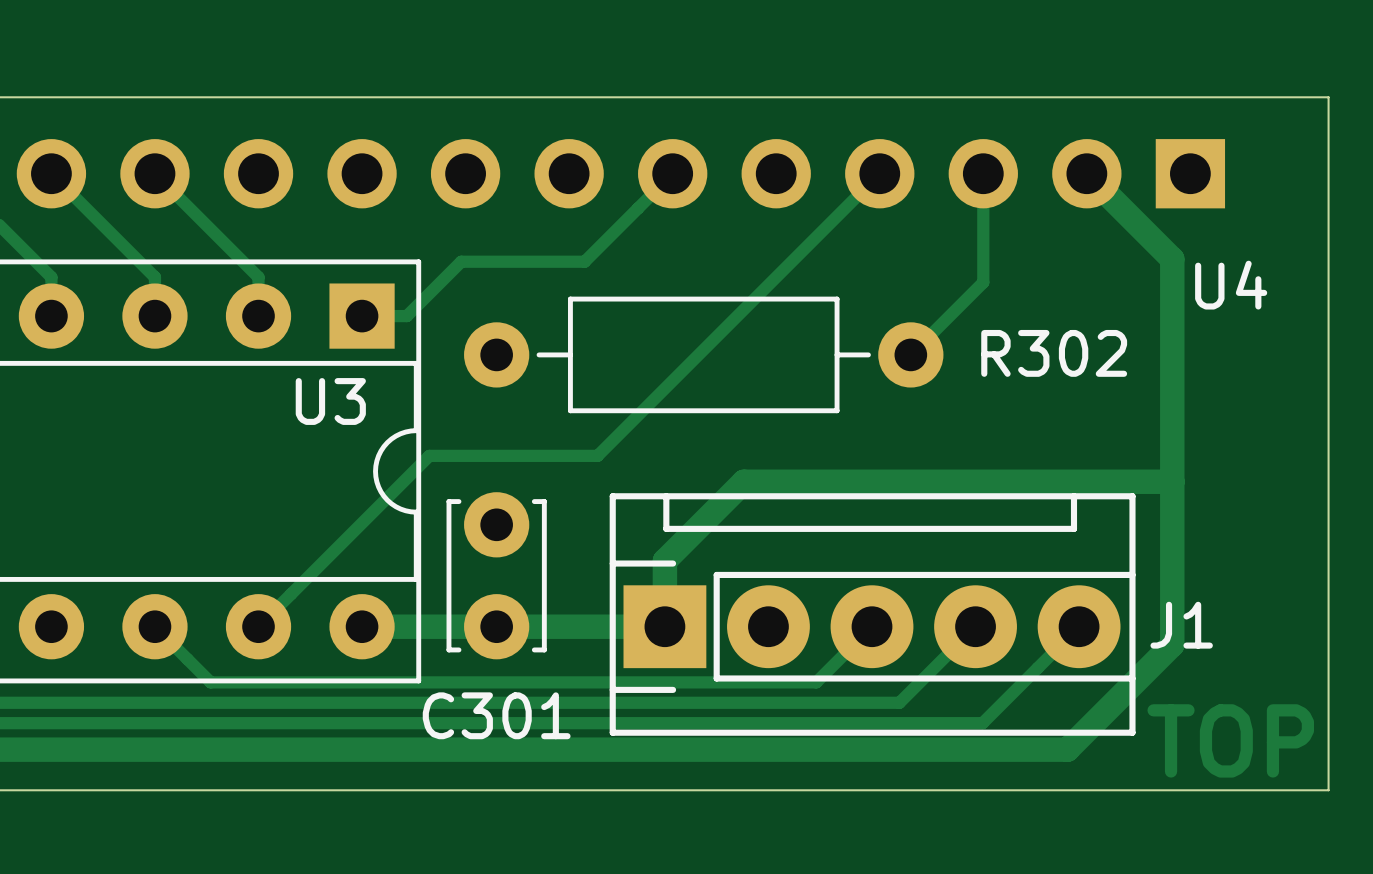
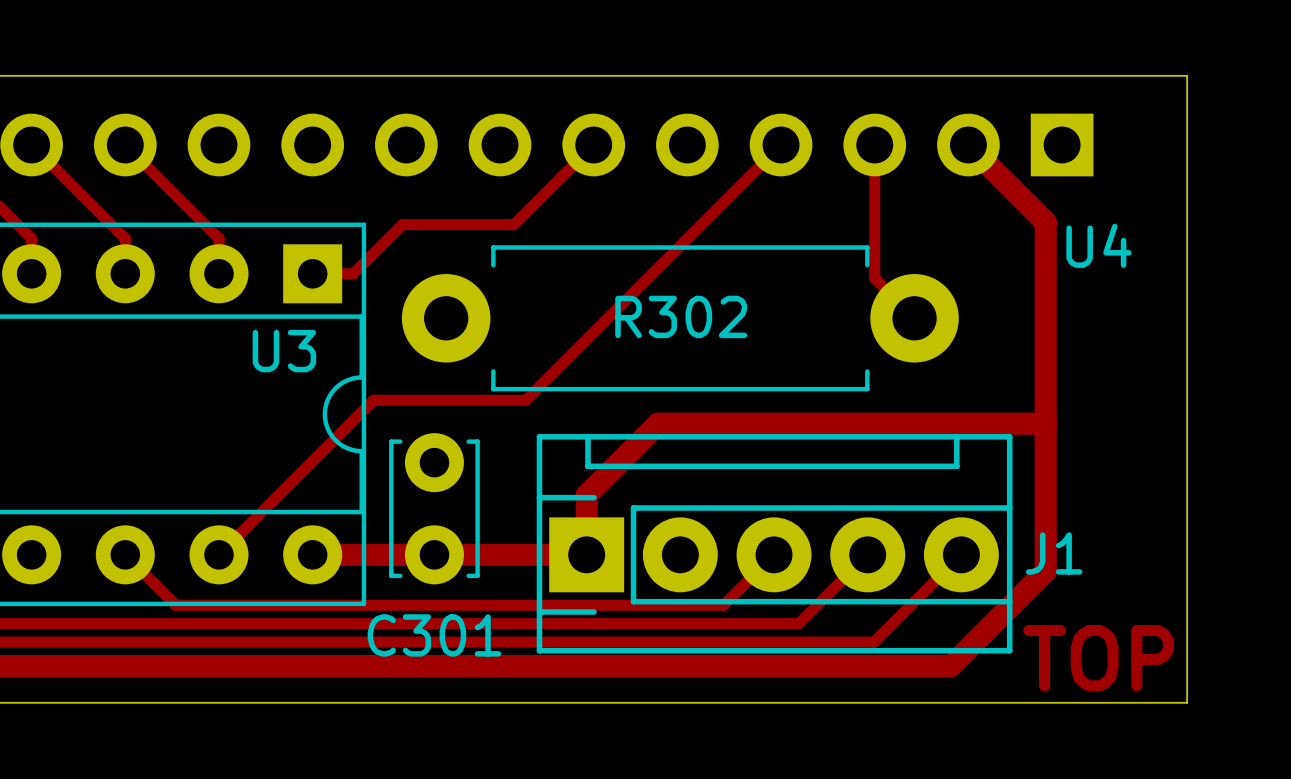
track: (983, 282) (910, 354) -> (874, 243) (874, 278) (914, 318)
R302 footprint: [464, 296, 944, 414] -> [401, 245, 959, 392]
R302 name position: R302 (1054, 353) -> R302 (681, 316)

